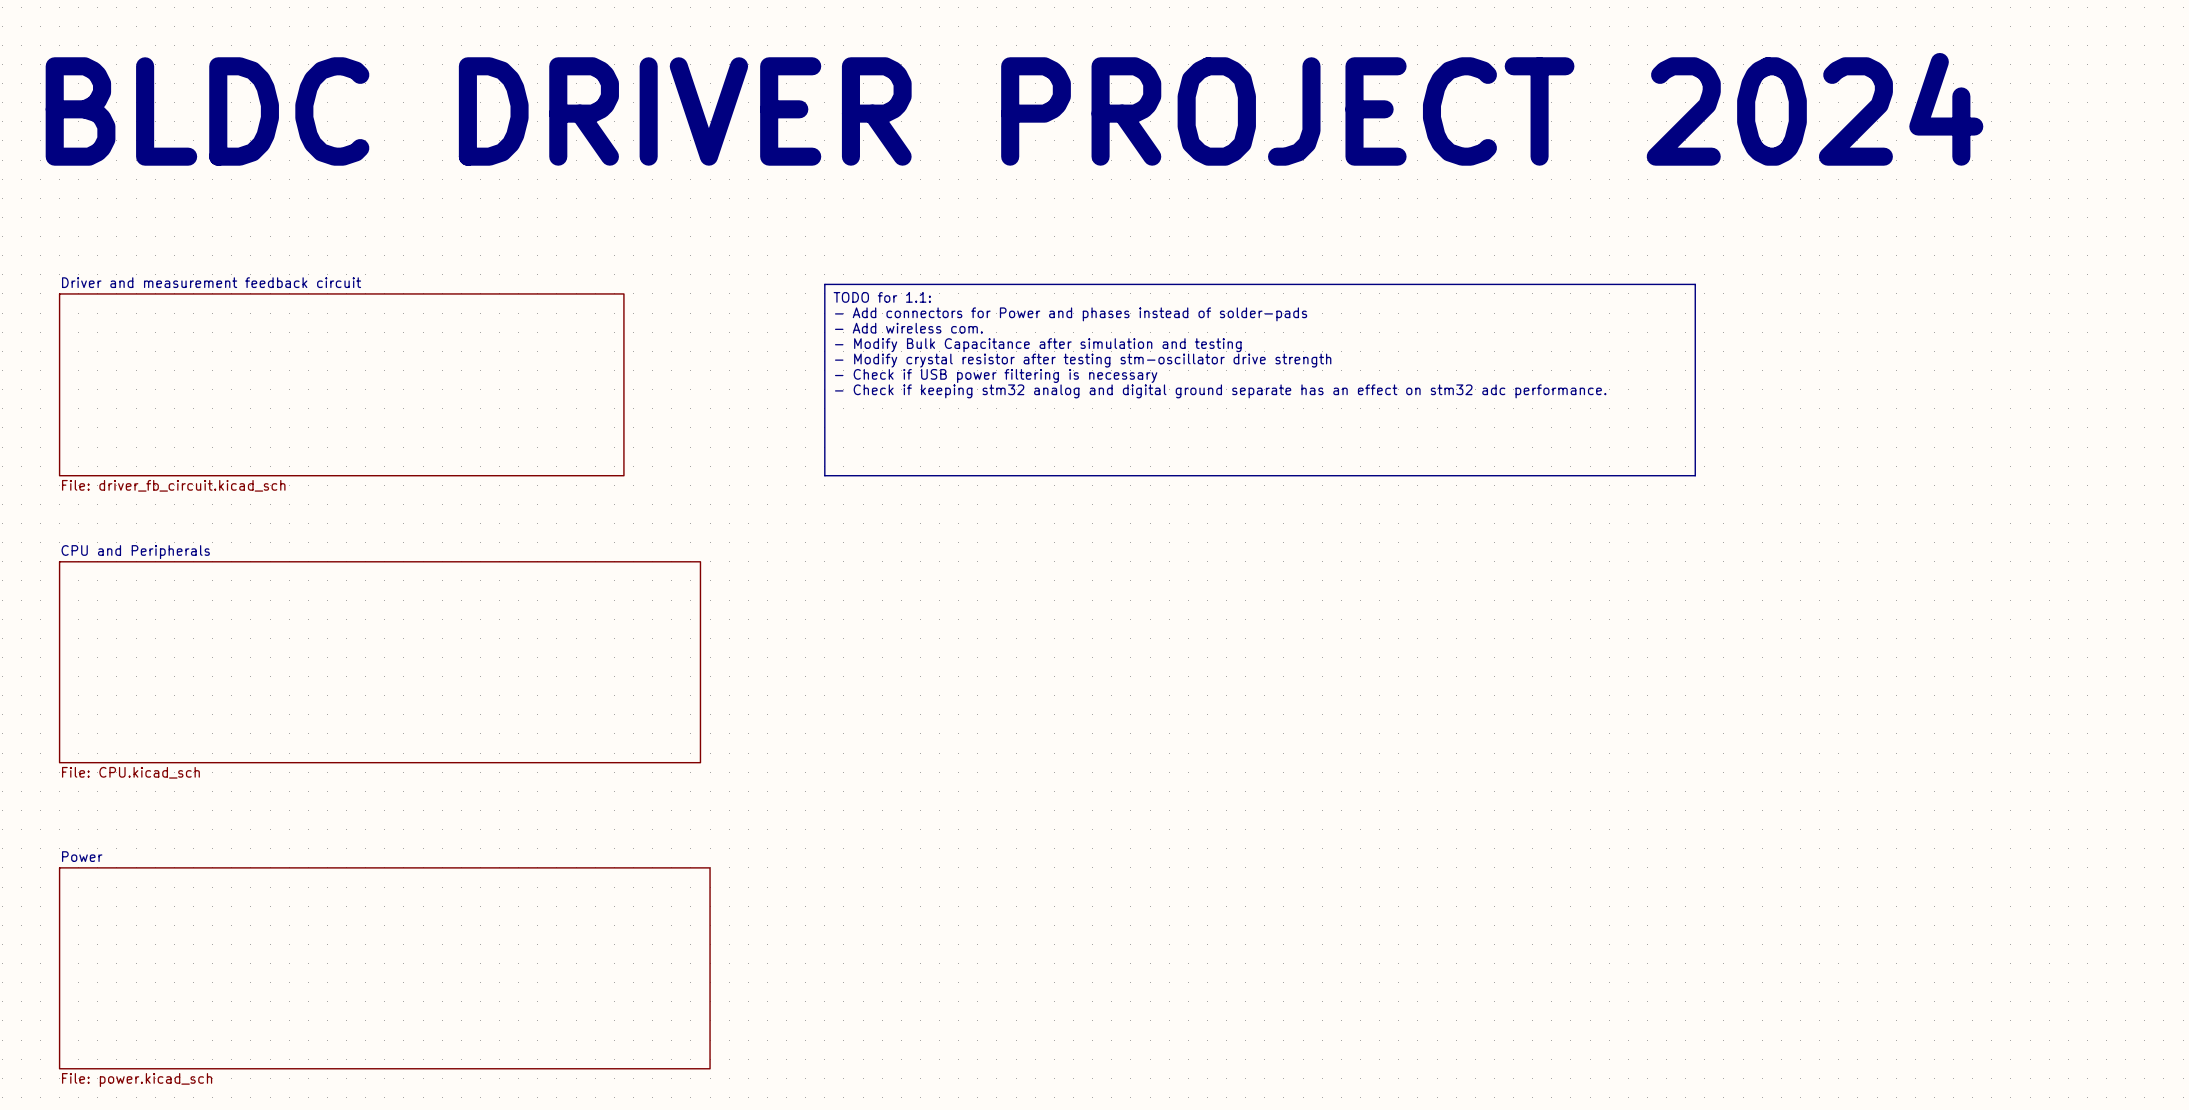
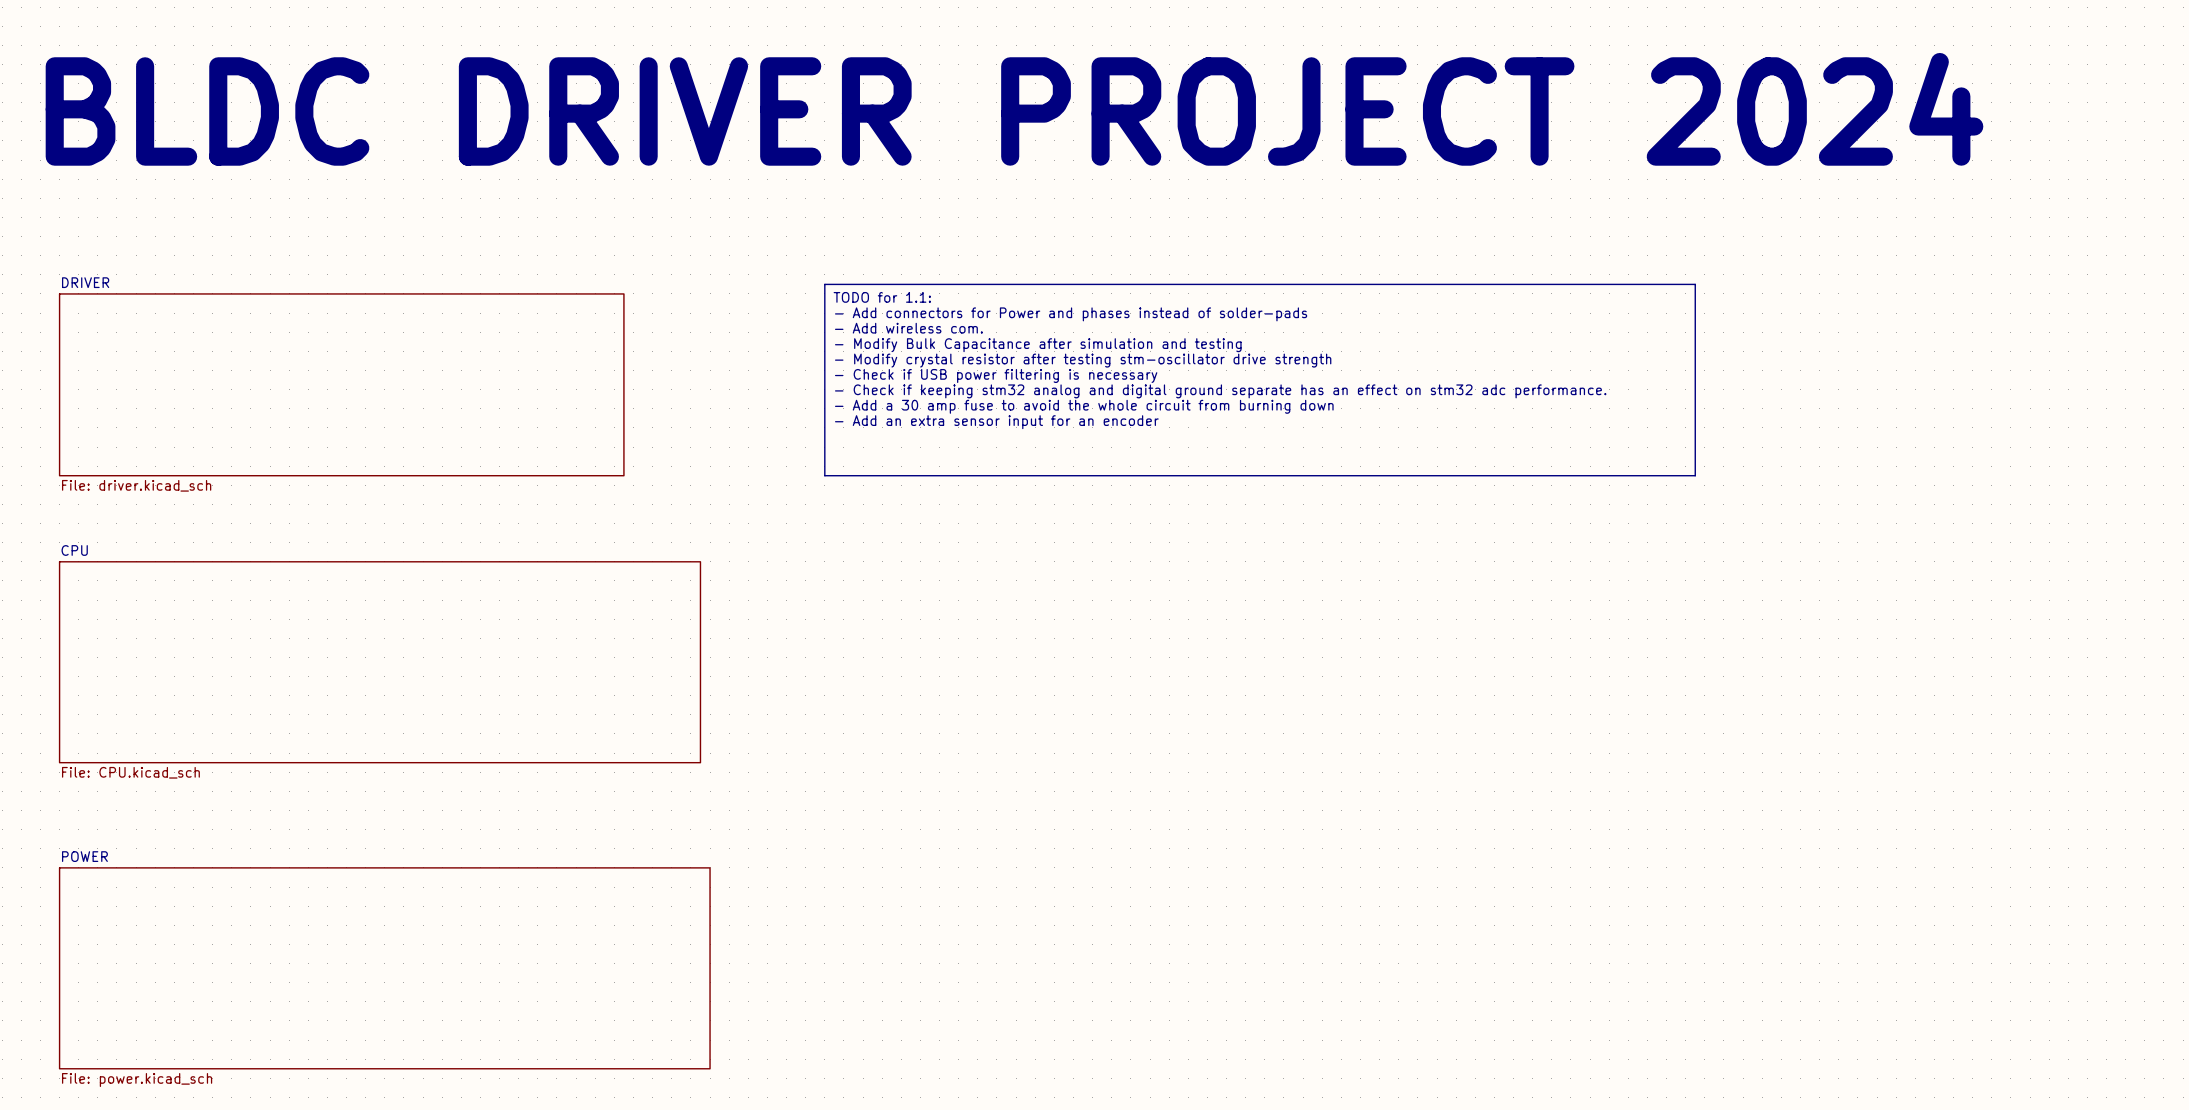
sheet Driver and measurement feedback circuit name: Driver and measurement feedback circuit (211, 282) -> DRIVER (85, 282)
text: none -> - Add a 30 amp fuse to avoid the whole circuit from burning down (1084, 406)
text: none -> - Add an extra sensor input for an encoder (996, 422)
sheet Driver and measurement feedback circuit value: File: driver_fb_circuit.kicad_sch (173, 485) -> File: driver.kicad_sch (136, 485)
sheet CPU and Peripherals name: CPU and Peripherals (135, 552) -> CPU (74, 550)
sheet Power name: Power (82, 856) -> POWER (84, 856)

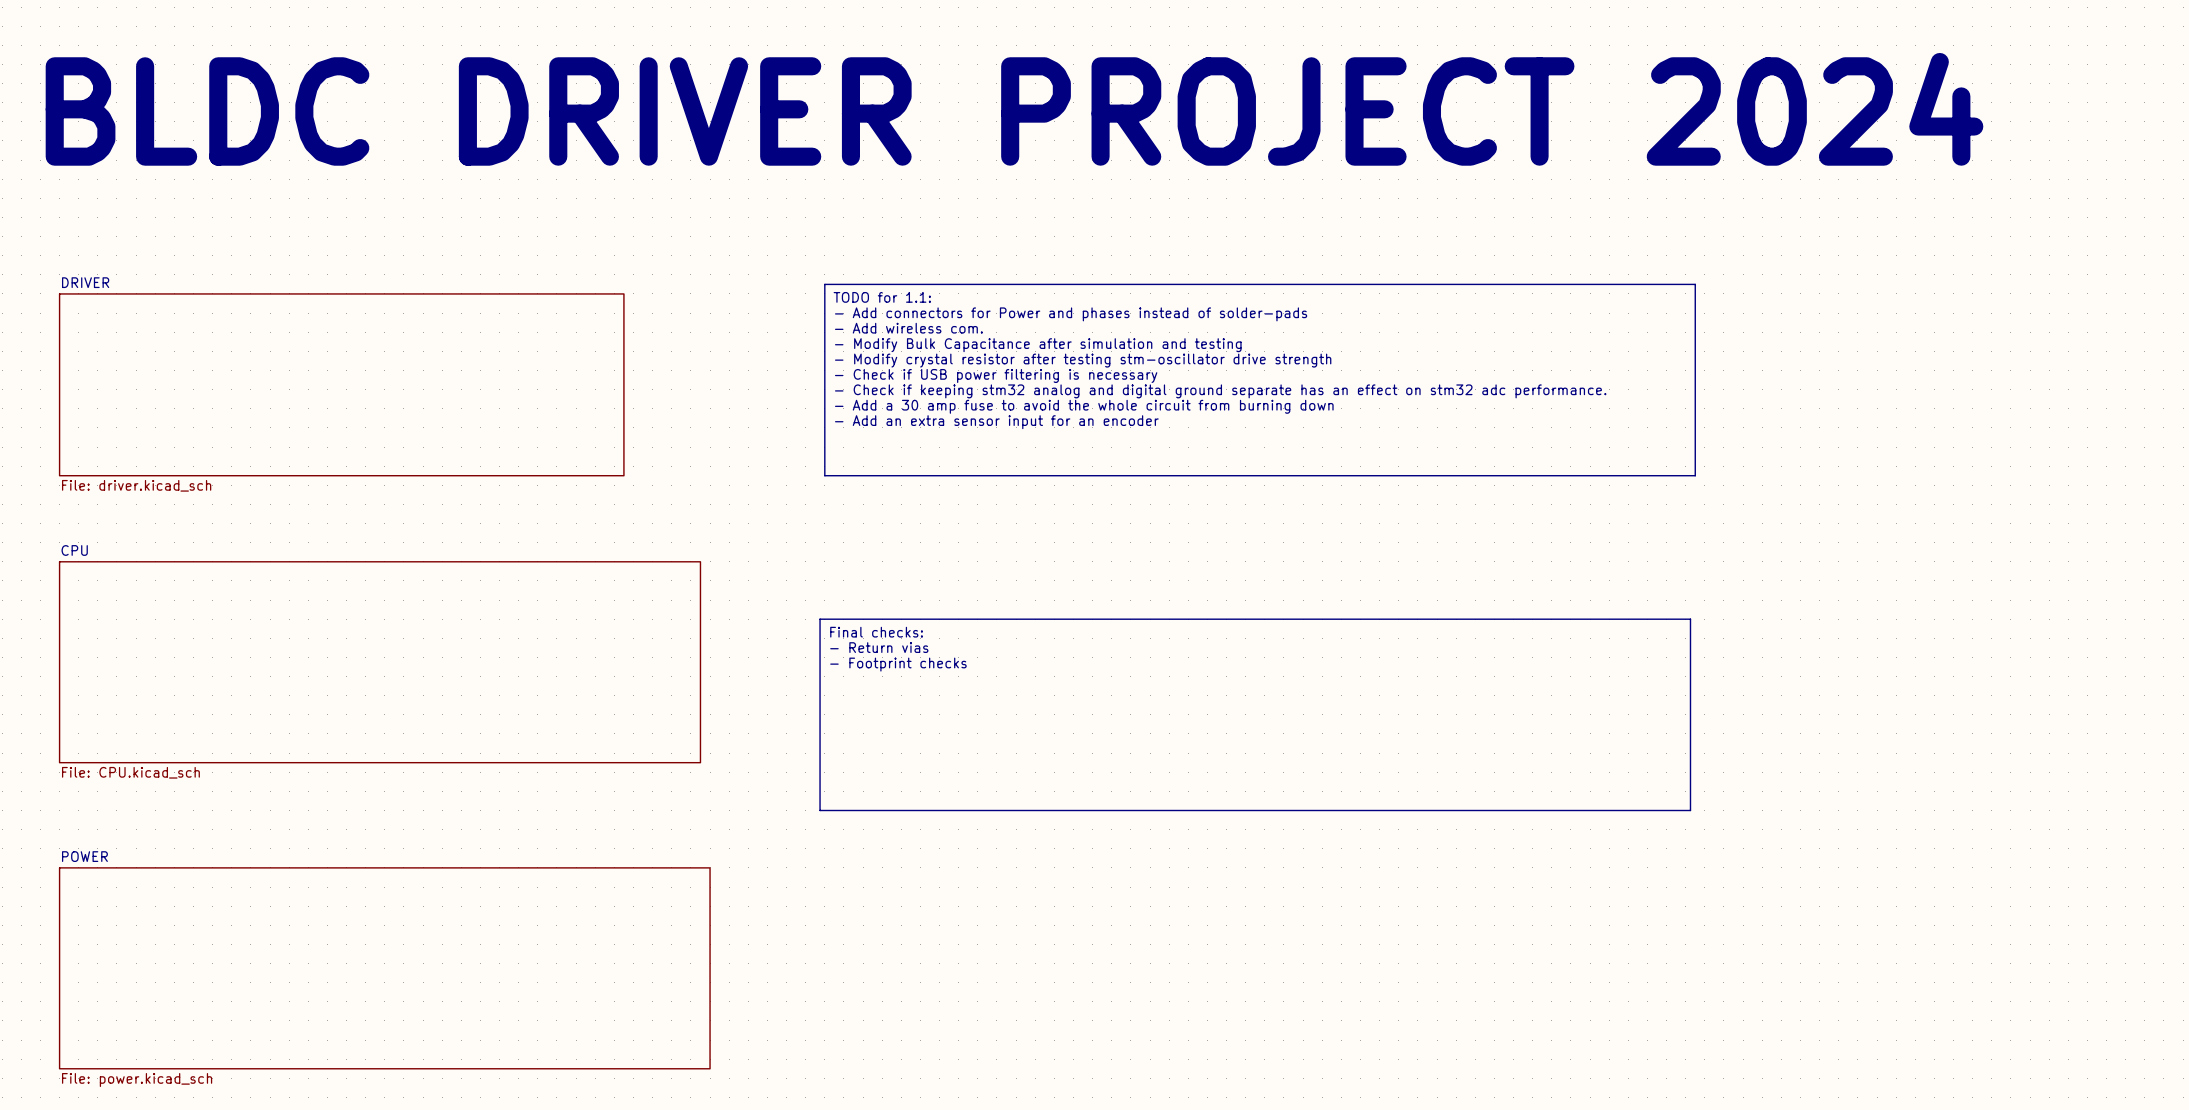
line: none -> (820, 619) (1690, 619) (1690, 810) (820, 810) (820, 619)
text: none -> Final checks: (876, 632)
text: none -> - Return vias (879, 647)
text: none -> - Footprint checks (898, 664)

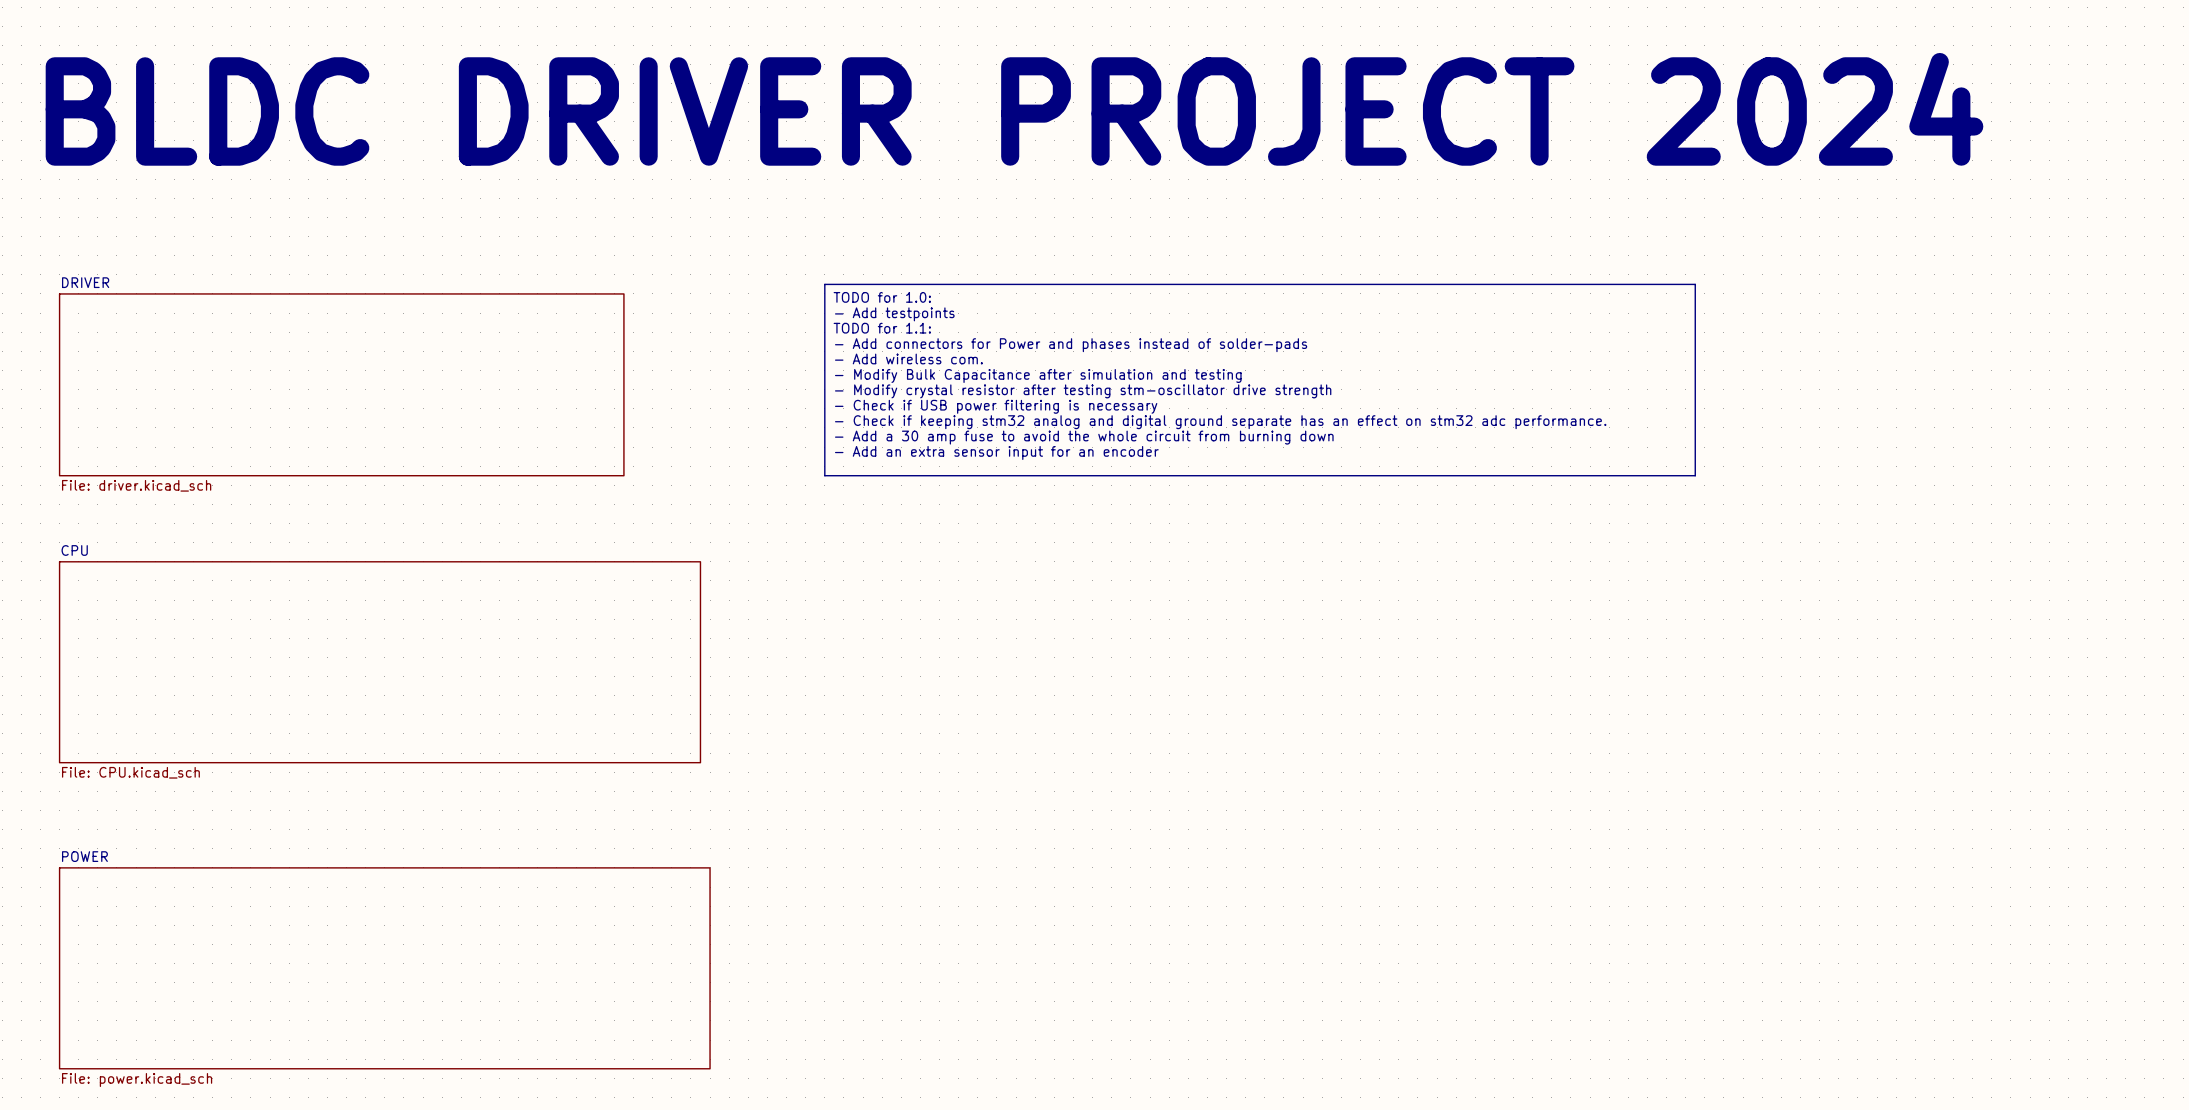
text: TODO for 1.1: (882, 297) -> TODO for 1.0: (882, 297)
text: - Add connectors for Power and phases instead of solder-pads (1071, 314) -> - Add testpoints (894, 314)
text: - Add wireless com. (908, 328) -> TODO for 1.1: (882, 328)
text: - Modify Bulk Capacitance after simulation and testing (1038, 345) -> - Add connectors for Power and phases instead of solder-pads (1071, 345)
text: - Modify crystal resistor after testing stm-oscillator drive strength (1083, 360) -> - Add wireless com. (908, 358)
text: - Check if USB power filtering is necessary (996, 375) -> - Modify Bulk Capacitance after simulation and testing (1038, 375)
text: - Check if keeping stm32 analog and digital ground separate has an effect on stm32 adc performance. (1220, 391) -> - Modify crystal resistor after testing stm-oscillator drive strength (1083, 391)
text: - Add a 30 amp fuse to avoid the whole circuit from burning down (1084, 406) -> - Check if USB power filtering is necessary (996, 406)
text: - Add an extra sensor input for an encoder (996, 422) -> - Check if keeping stm32 analog and digital ground separate has an effect on stm32 adc performance. (1220, 422)
text: none -> - Add a 30 amp fuse to avoid the whole circuit from burning down (1084, 437)
text: none -> - Add an extra sensor input for an encoder (996, 452)
line: (820, 619) (1690, 619) (1690, 810) (820, 810) (820, 619) -> none
text: Final checks: (876, 632) -> none
text: - Return vias (879, 647) -> none
text: - Footprint checks (898, 664) -> none

